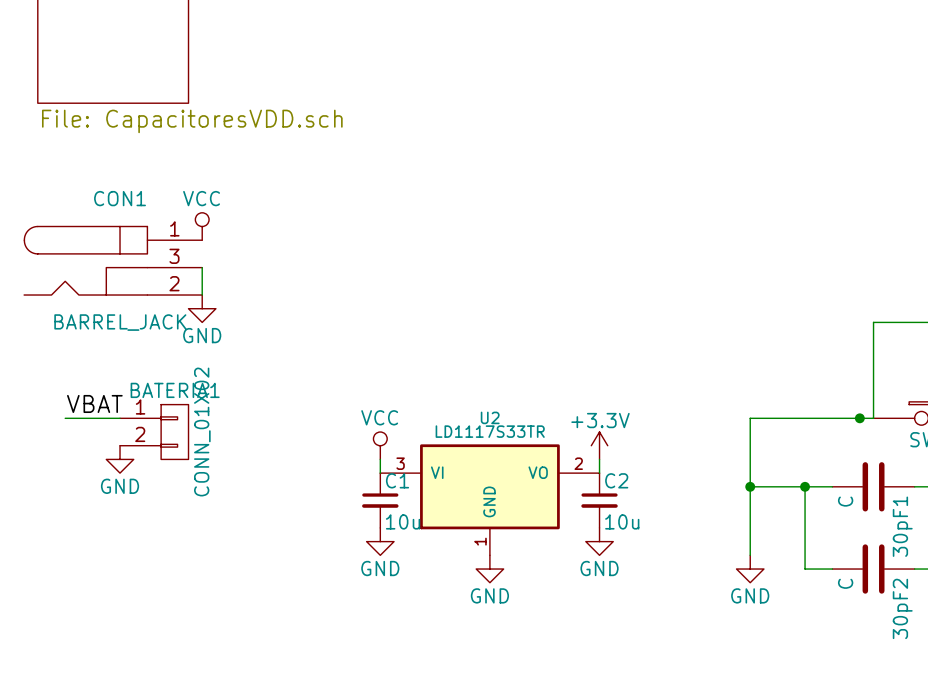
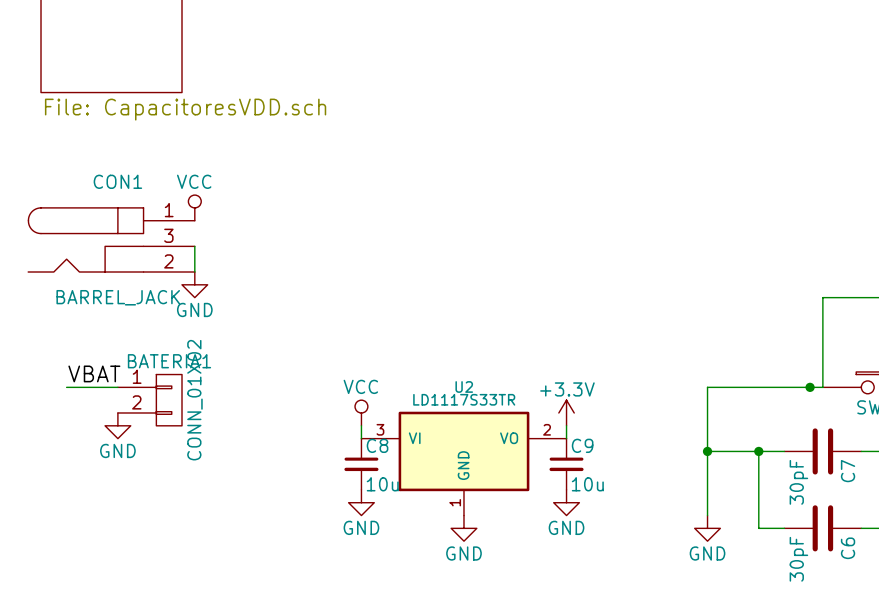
C1 name: C1 (397, 480) -> C8 (377, 445)
C2 name: C2 (616, 480) -> C9 (582, 445)
30pF1 value: C (845, 501) -> 30pF (798, 482)
30pF1 name: 30pF1 (902, 526) -> C7 (848, 471)
30pF2 value: C (845, 583) -> 30pF (798, 559)
30pF2 name: 30pF2 (902, 608) -> C6 (848, 548)

